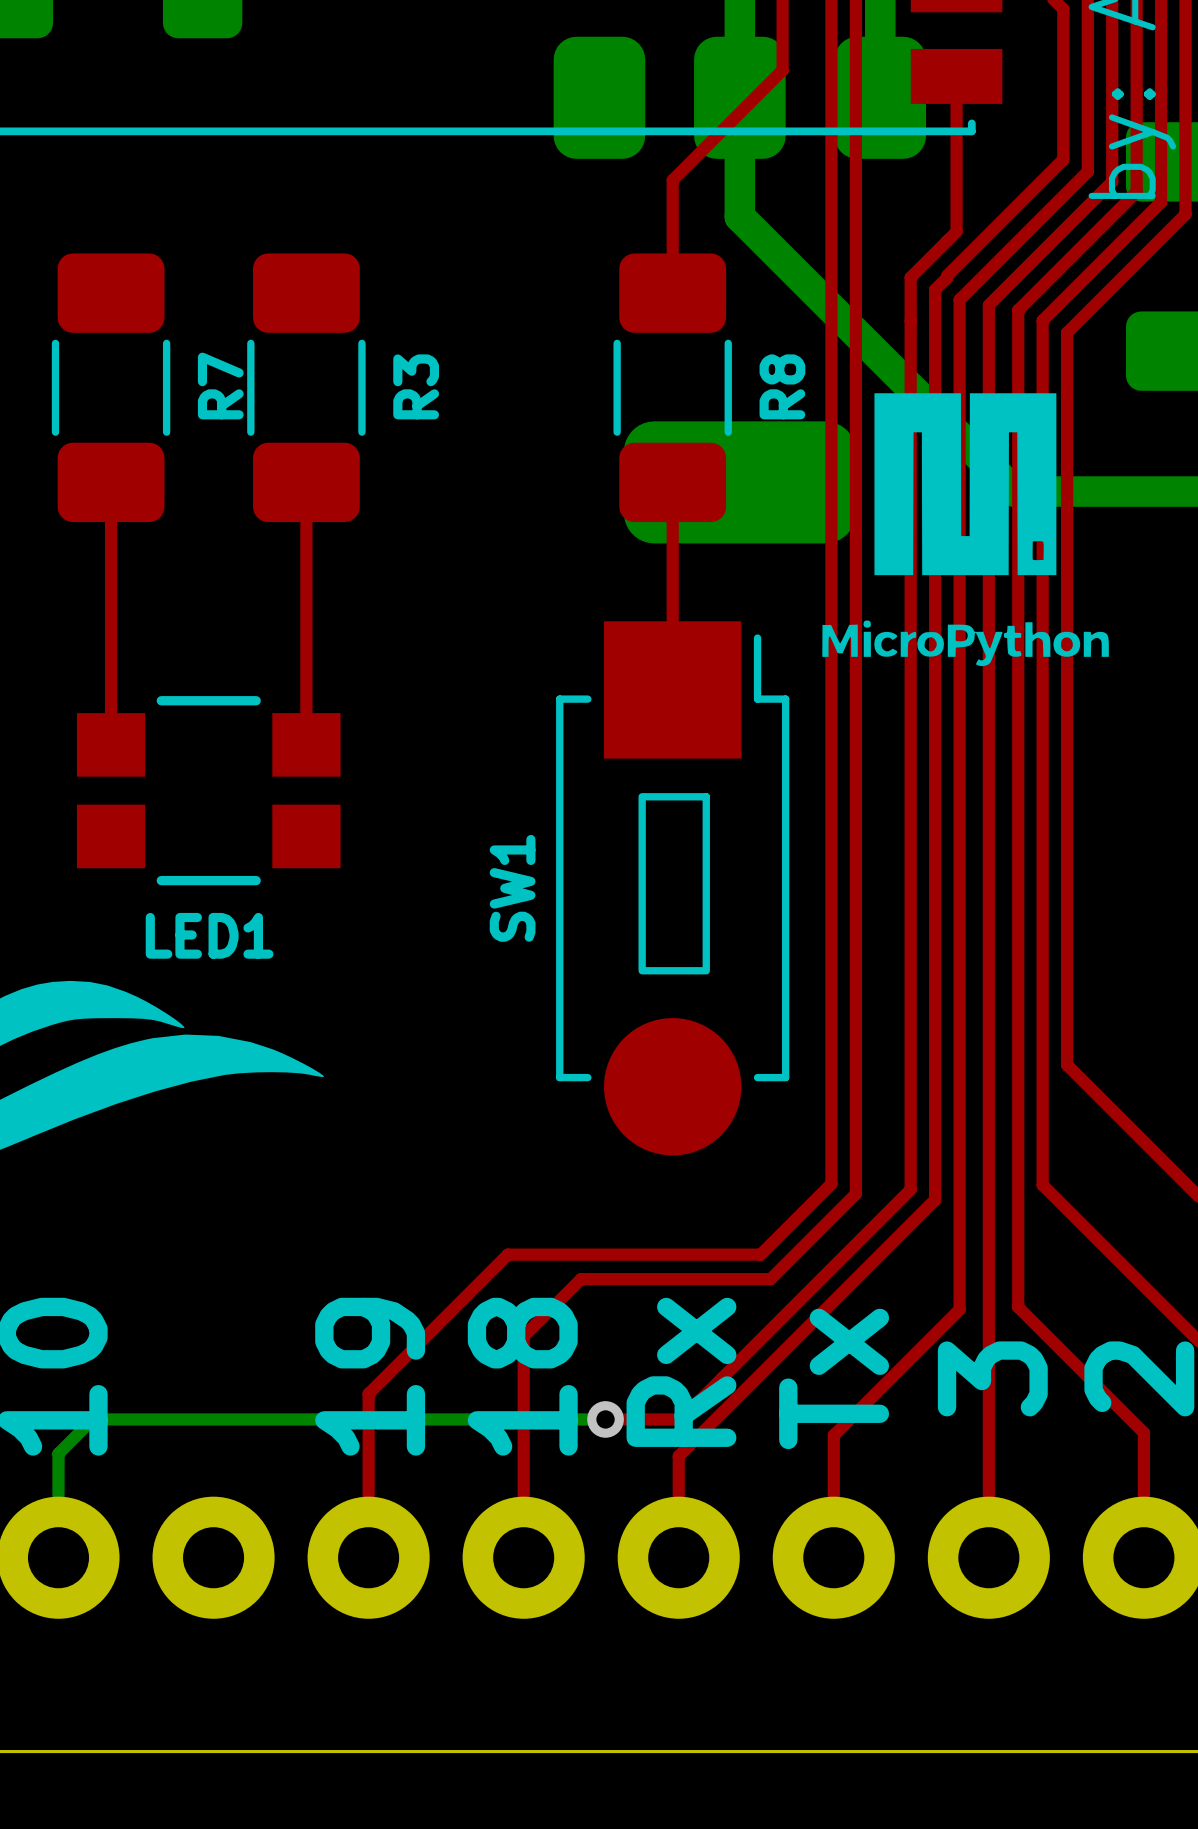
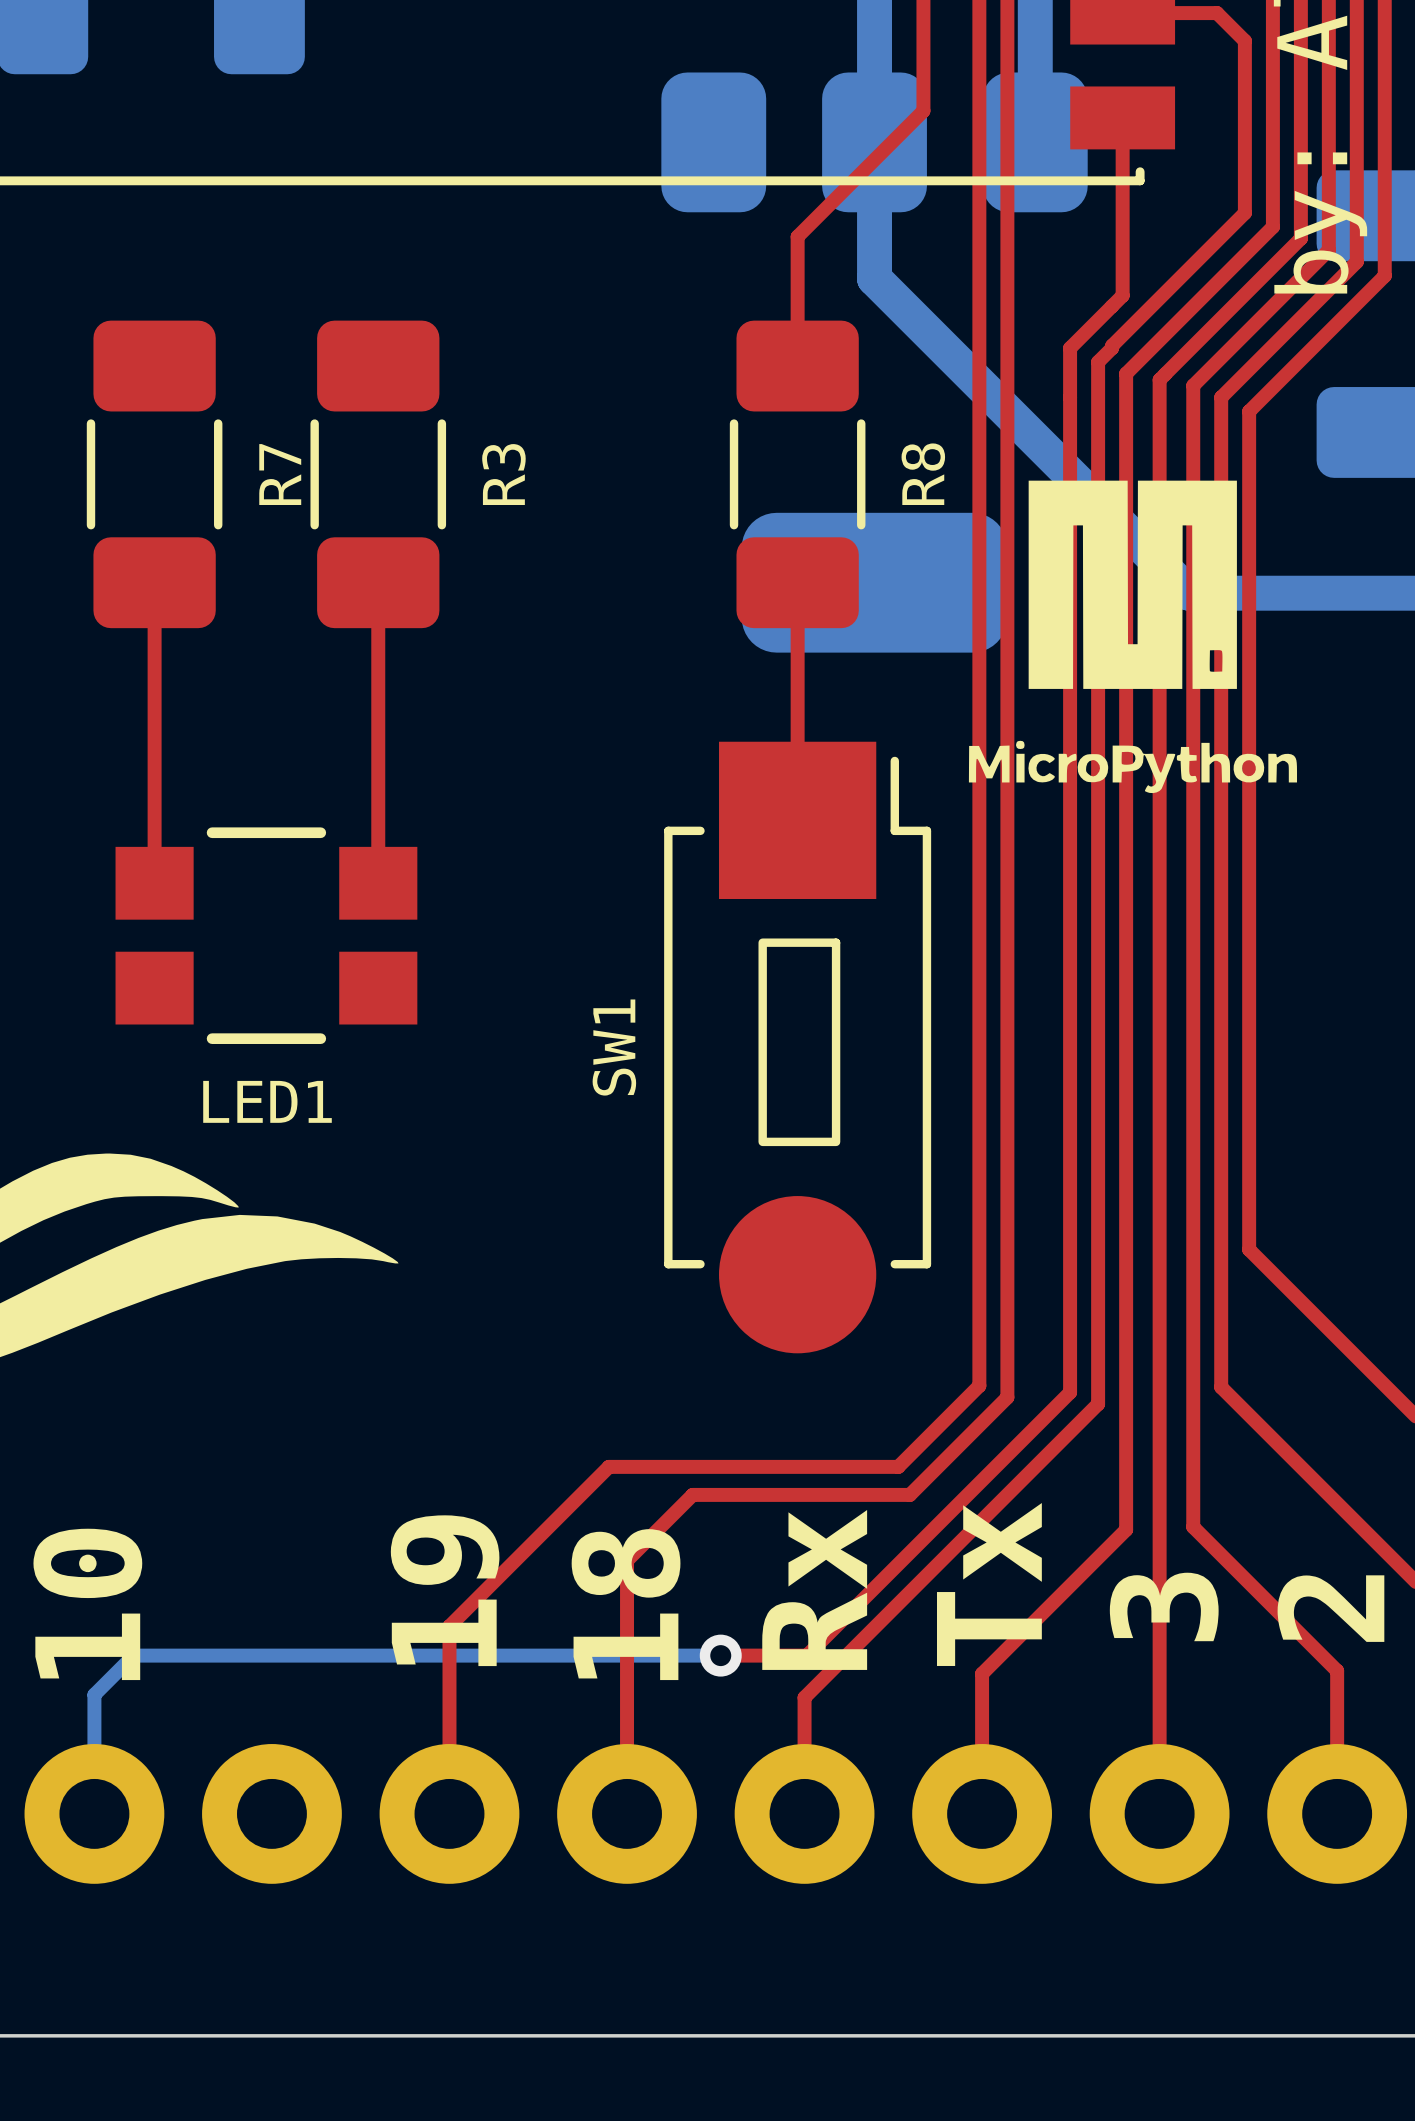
text position: Rx (681, 1372) -> Rx (814, 1589)
text position: 19 (370, 1376) -> 19 (445, 1590)
text position: Tx (834, 1378) -> Tx (989, 1584)

